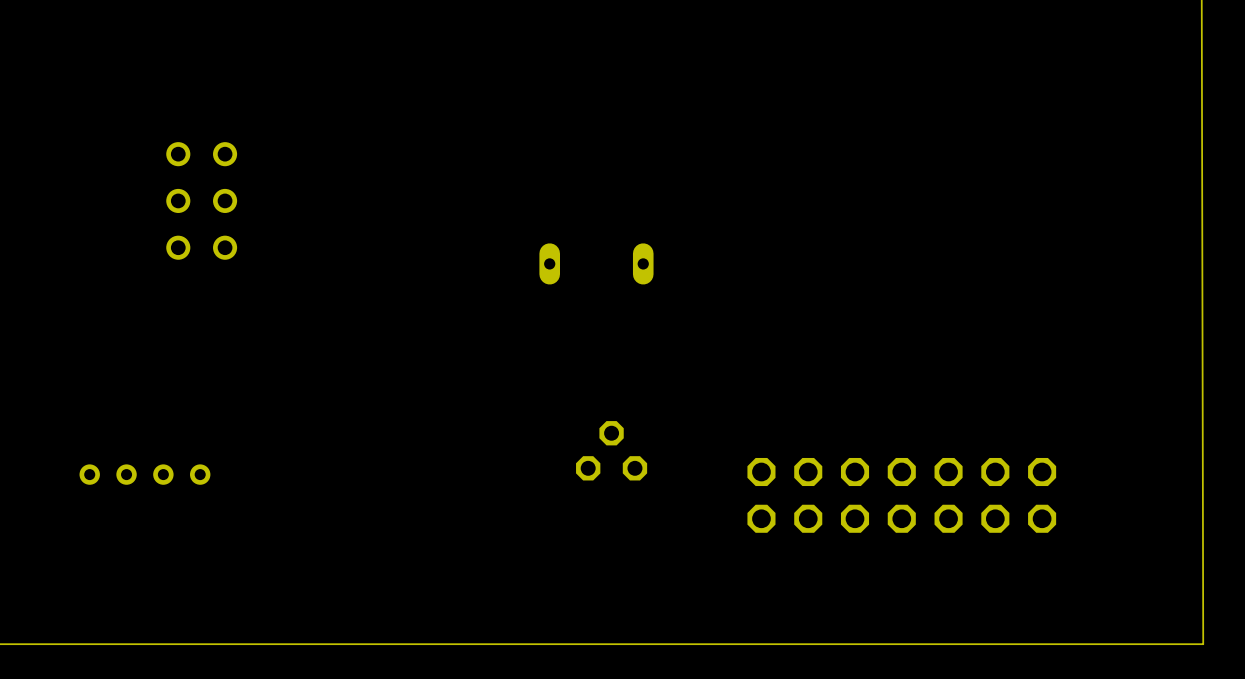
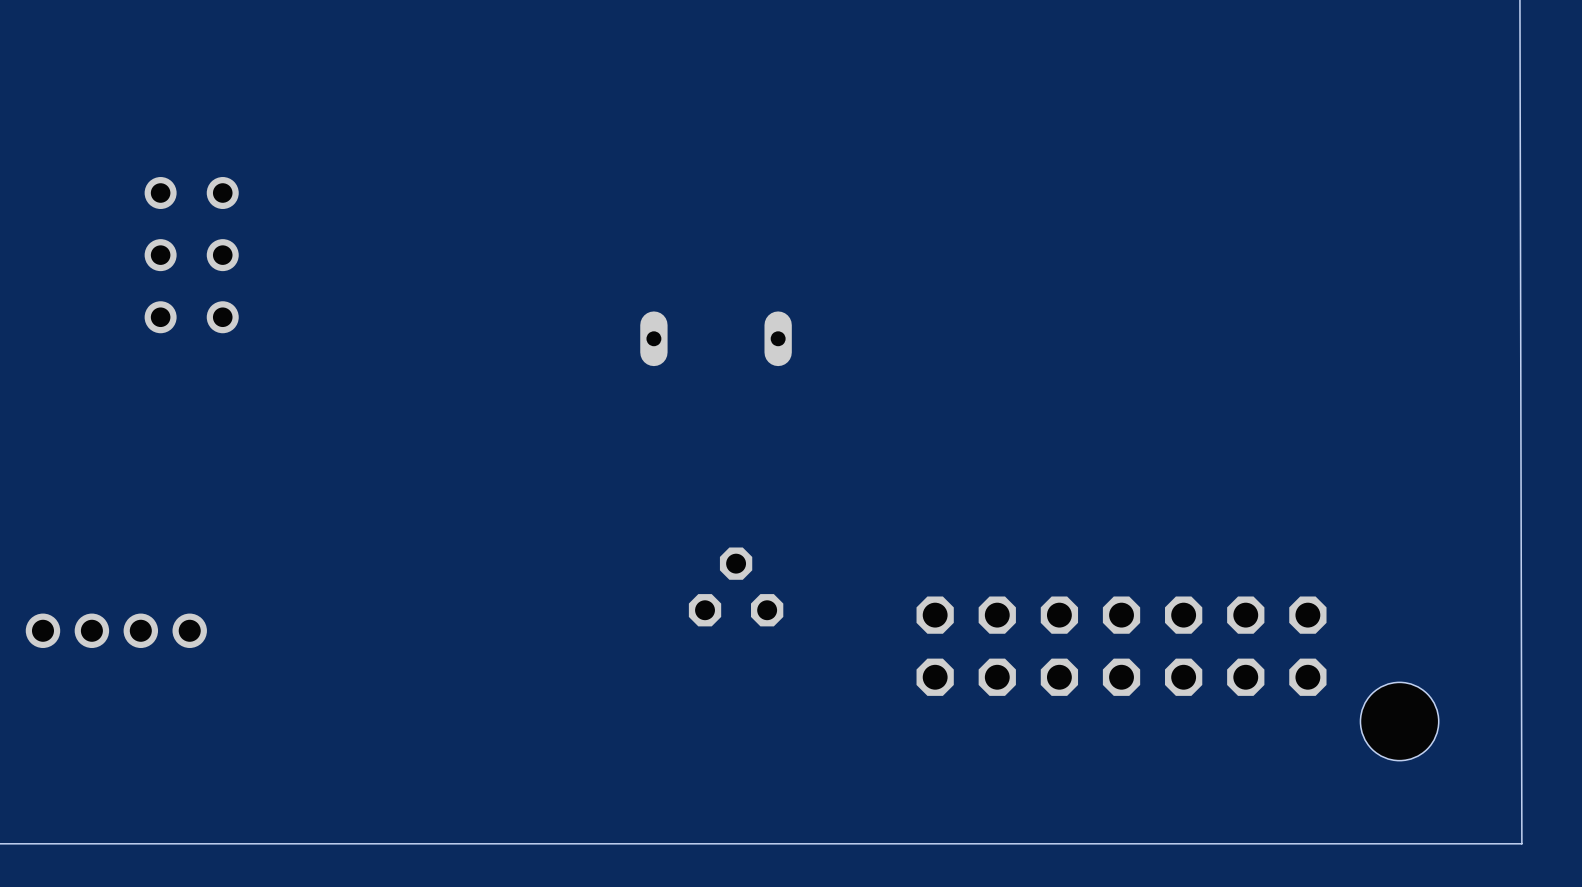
part footprint: [79, 464, 211, 485] -> [25, 613, 207, 648]
hole: none -> (1399, 721)

